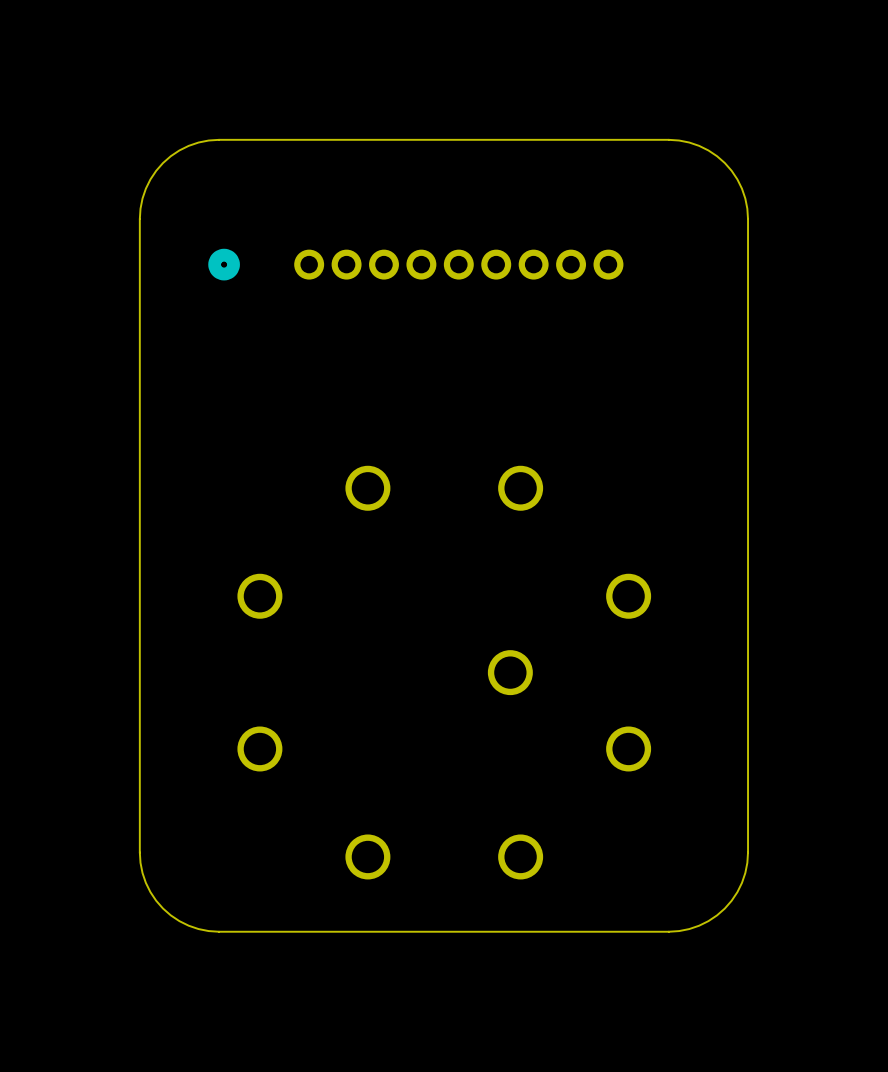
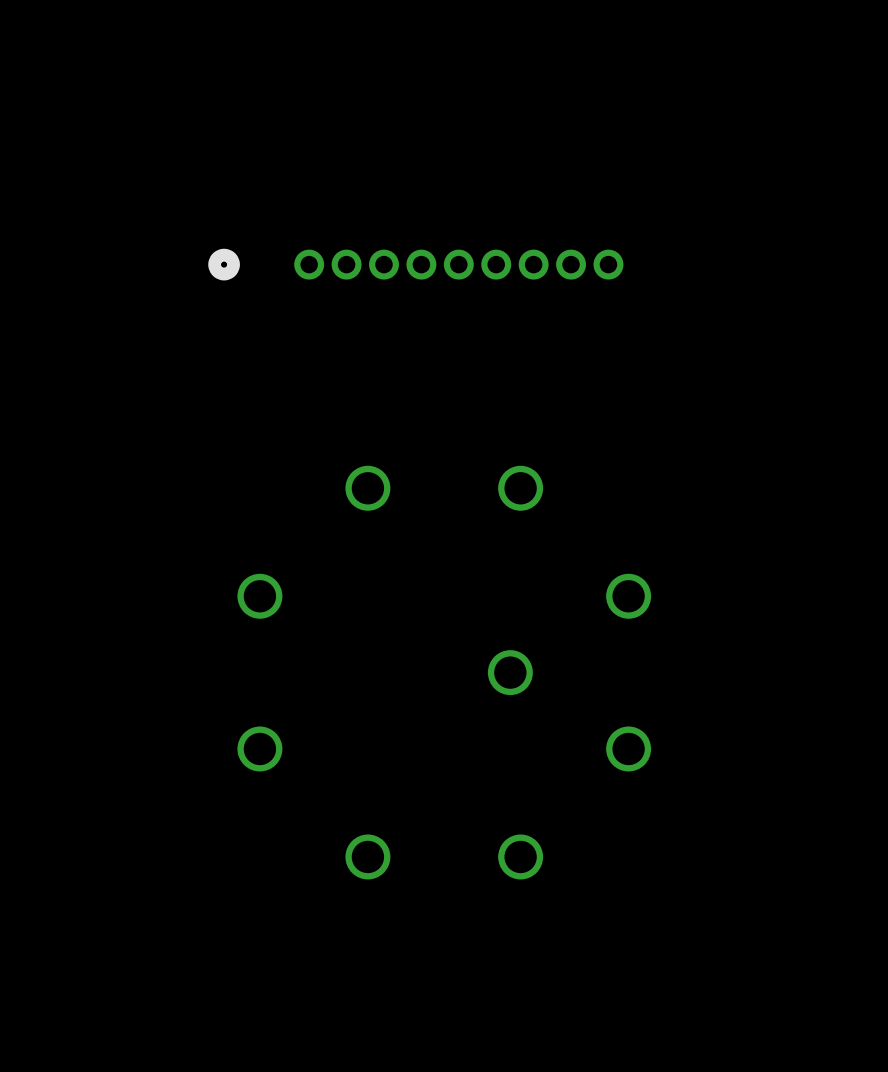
board edge: (668, 139) (208, 140) (188, 145) (170, 156) (150, 179) (142, 198) (139, 219) (139, 852) (142, 873) (150, 892) (163, 908) (179, 921) (198, 929) (219, 931) (668, 931) (689, 929) (708, 921) (724, 908) (737, 892) (745, 873) (748, 852) (747, 208) (737, 179) (717, 156) (689, 142) (668, 139) -> none

